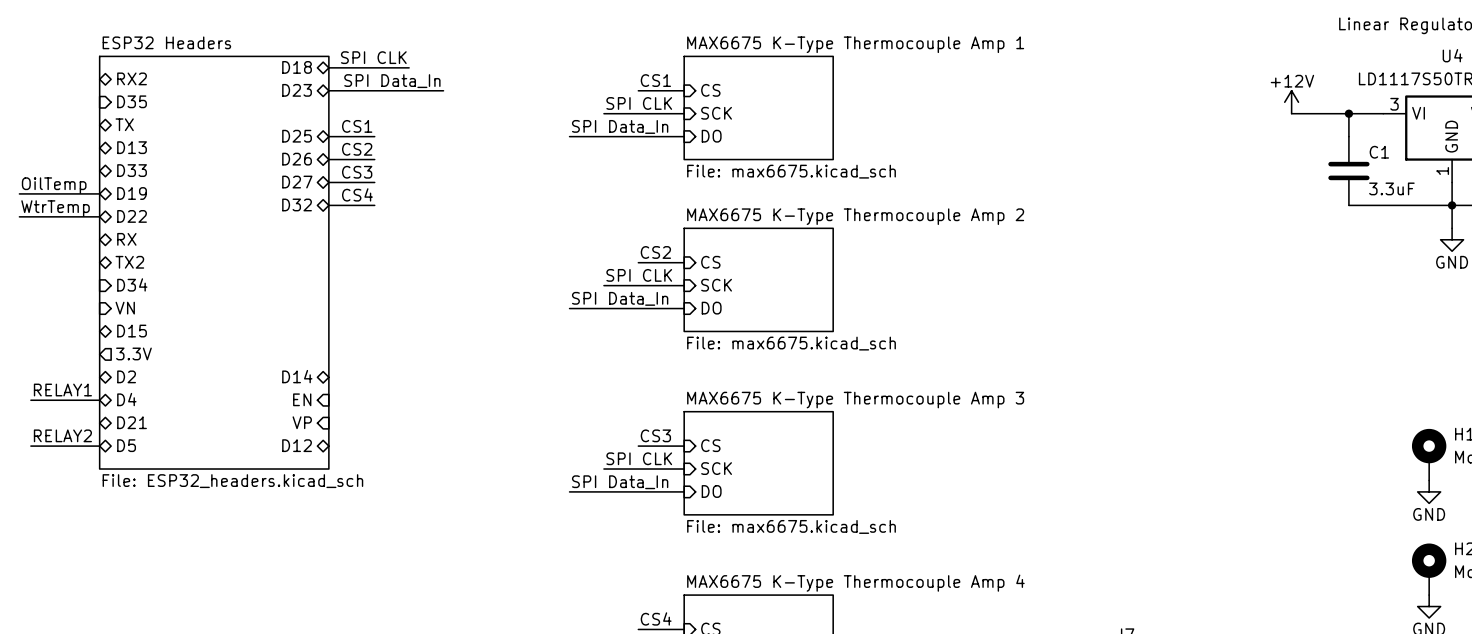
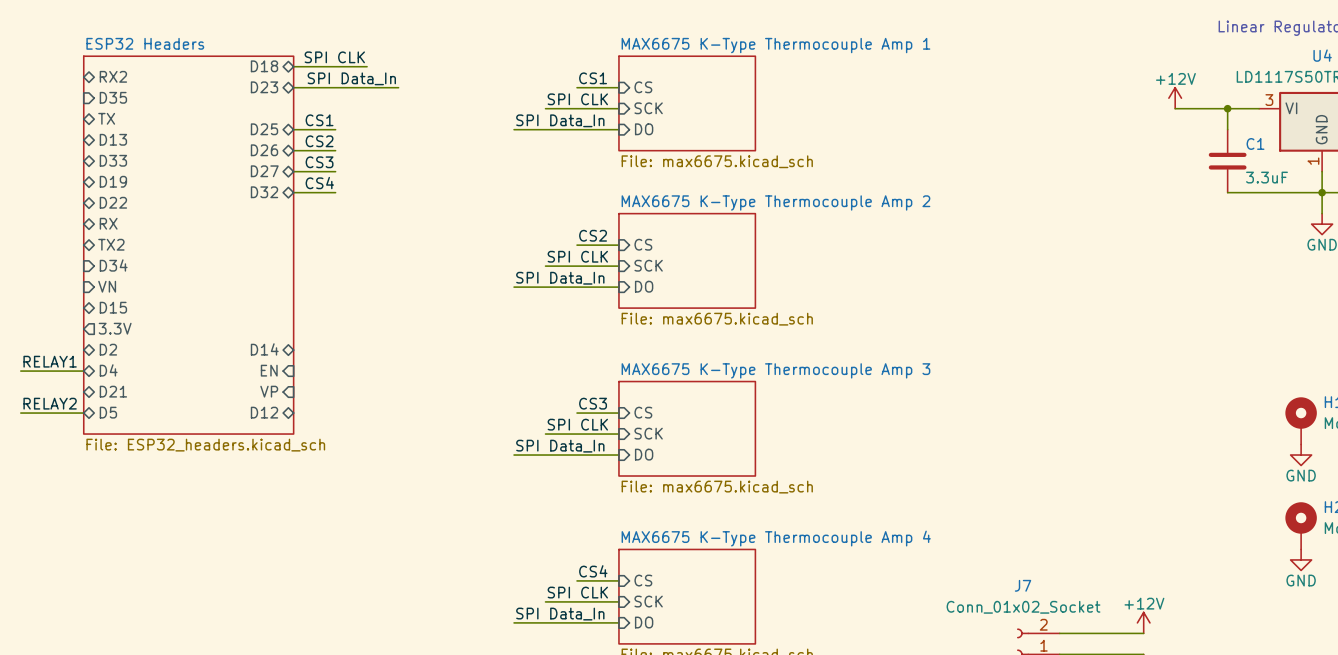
label: OilTemp (54, 185) -> none
wire: (19, 193) (99, 193) -> none
label: WtrTemp (55, 208) -> none
wire: (19, 216) (99, 216) -> none

